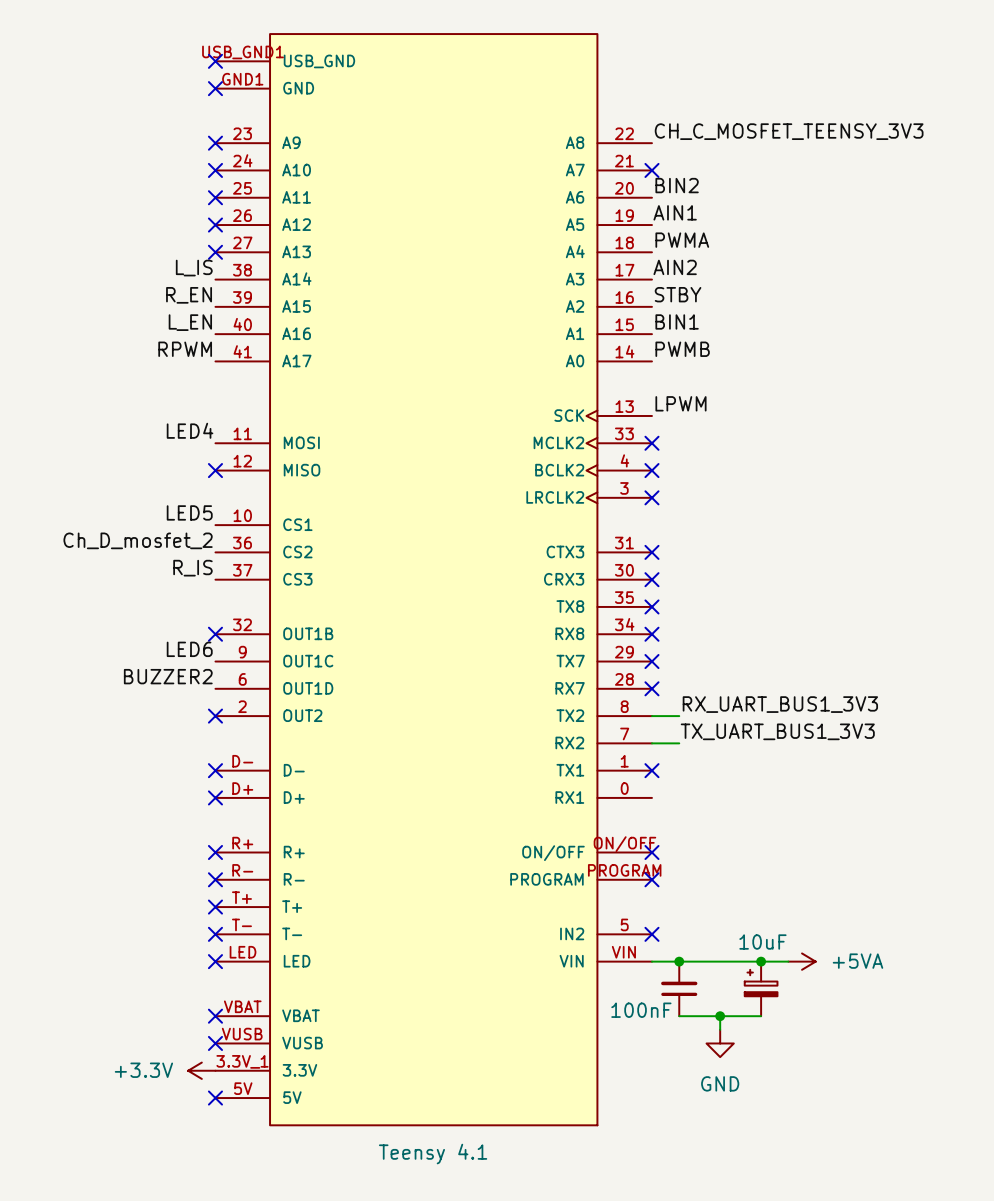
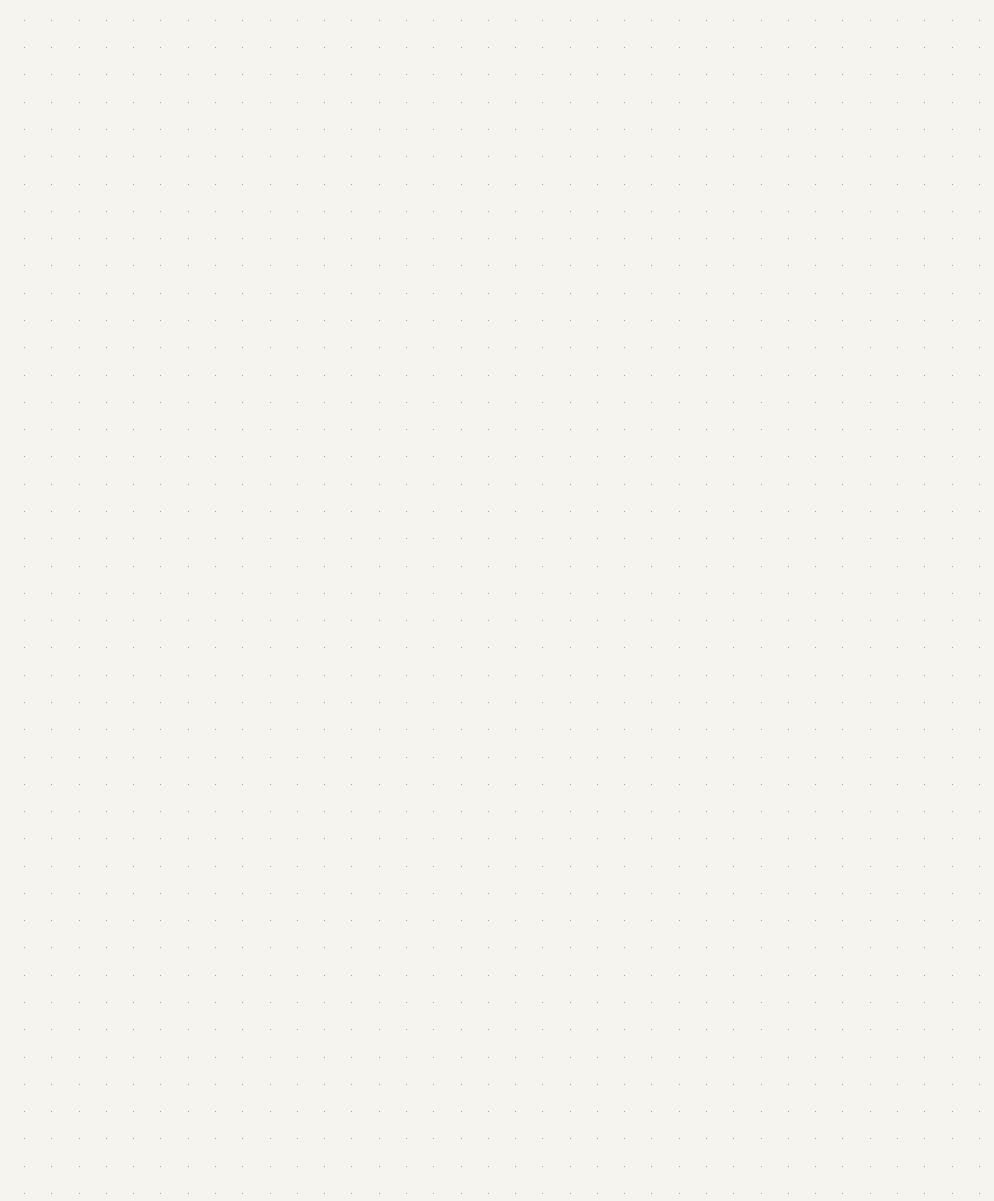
no-connect mark: (215, 61) -> none
no-connect mark: (215, 88) -> none
label: CH_C_MOSFET_TEENSY_3V3 (789, 131) -> none
no-connect mark: (215, 143) -> none
no-connect mark: (215, 170) -> none
no-connect mark: (651, 170) -> none
label: BIN2 (677, 185) -> none
no-connect mark: (215, 197) -> none
label: AIN1 (675, 212) -> none
no-connect mark: (215, 225) -> none
label: PWMA (682, 240) -> none
no-connect mark: (215, 252) -> none
label: AIN2 (675, 267) -> none
label: L_IS (194, 268) -> none
label: STBY (678, 294) -> none
label: R_EN (189, 295) -> none
label: BIN1 (677, 321) -> none
label: L_EN (190, 322) -> none
label: RPWM (185, 349) -> none
label: PWMB (682, 349) -> none
label: LPWM (680, 403) -> none
label: LED4 (190, 430) -> none
no-connect mark: (651, 443) -> none
no-connect mark: (215, 470) -> none
no-connect mark: (651, 470) -> none
no-connect mark: (651, 497) -> none
label: LED5 (189, 512) -> none
label: Ch_D_mosfet_2 (138, 540) -> none
no-connect mark: (651, 552) -> none
label: R_IS (192, 568) -> none
part: Teensy 4.1 (433, 579) -> none
no-connect mark: (651, 579) -> none
no-connect mark: (651, 606) -> none
no-connect mark: (215, 634) -> none
no-connect mark: (651, 634) -> none
label: LED6 (189, 649) -> none
no-connect mark: (651, 661) -> none
label: BUZZER2 (168, 676) -> none
no-connect mark: (651, 688) -> none
label: RX_UART_BUS1_3V3 (780, 704) -> none
no-connect mark: (215, 716) -> none
wire: (651, 716) (679, 716) -> none
label: TX_UART_BUS1_3V3 (777, 731) -> none
wire: (651, 743) (679, 743) -> none
no-connect mark: (215, 770) -> none
no-connect mark: (651, 770) -> none
no-connect mark: (215, 797) -> none
no-connect mark: (215, 852) -> none
no-connect mark: (651, 852) -> none
no-connect mark: (215, 879) -> none
no-connect mark: (651, 879) -> none
no-connect mark: (215, 907) -> none
no-connect mark: (215, 934) -> none
no-connect mark: (651, 934) -> none
no-connect mark: (215, 961) -> none
wire: (651, 961) (788, 961) -> none
junction: (679, 961) -> none
junction: (761, 961) -> none
power symbol: +5VA (802, 961) -> none
part: 100nF (679, 988) -> none
part: 10uF (761, 988) -> none
no-connect mark: (215, 1016) -> none
wire: (679, 1016) (761, 1016) -> none
wire: (720, 1016) (720, 1029) -> none
junction: (720, 1016) -> none
no-connect mark: (215, 1043) -> none
power symbol: GND (720, 1043) -> none
power symbol: +3.3V (201, 1070) -> none
no-connect mark: (215, 1098) -> none

